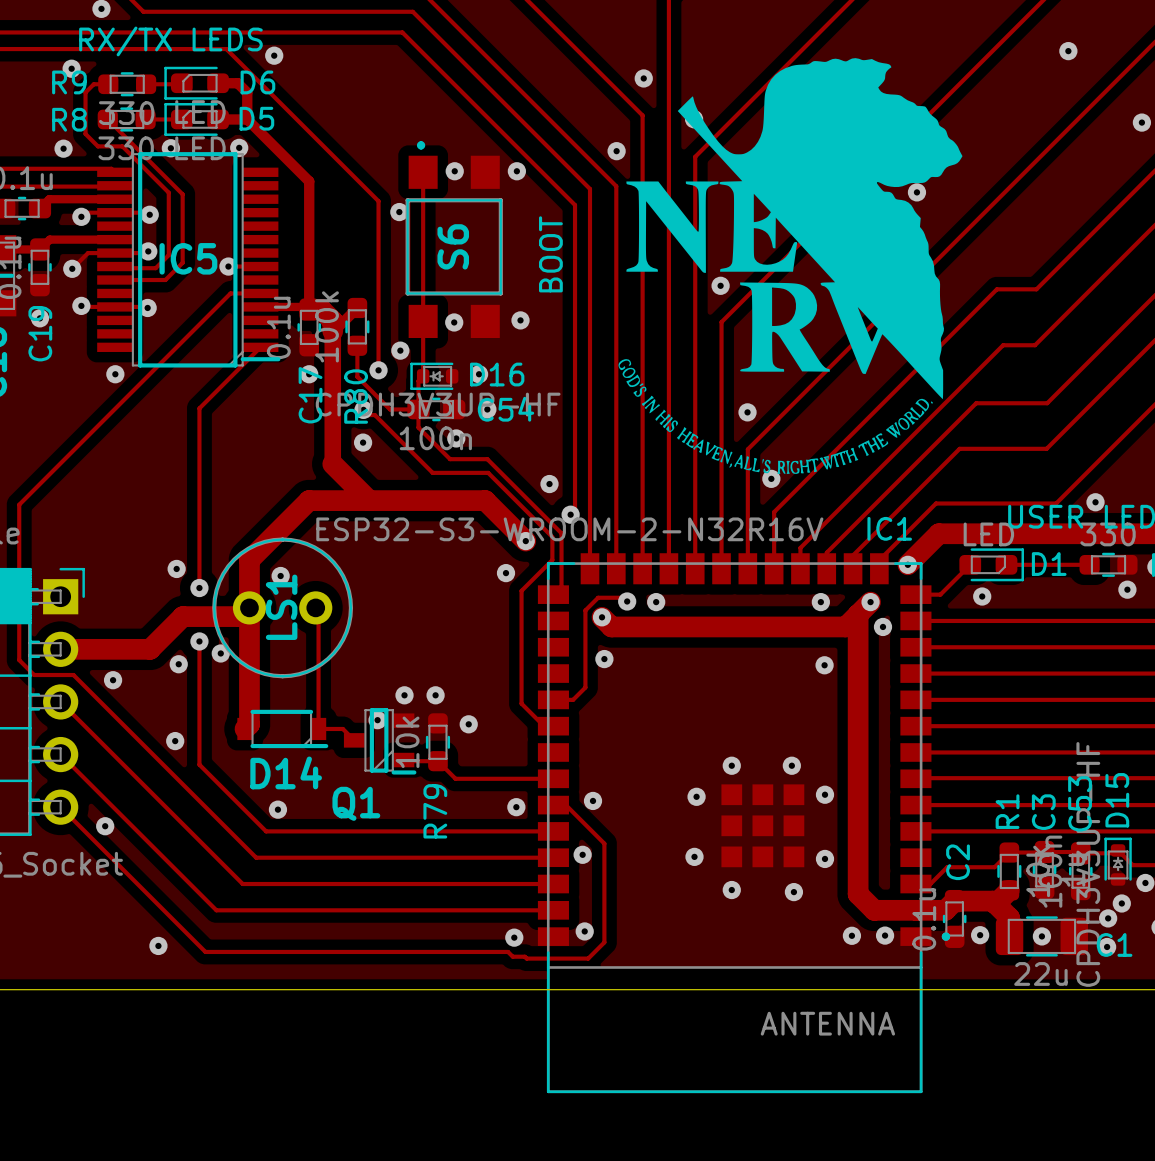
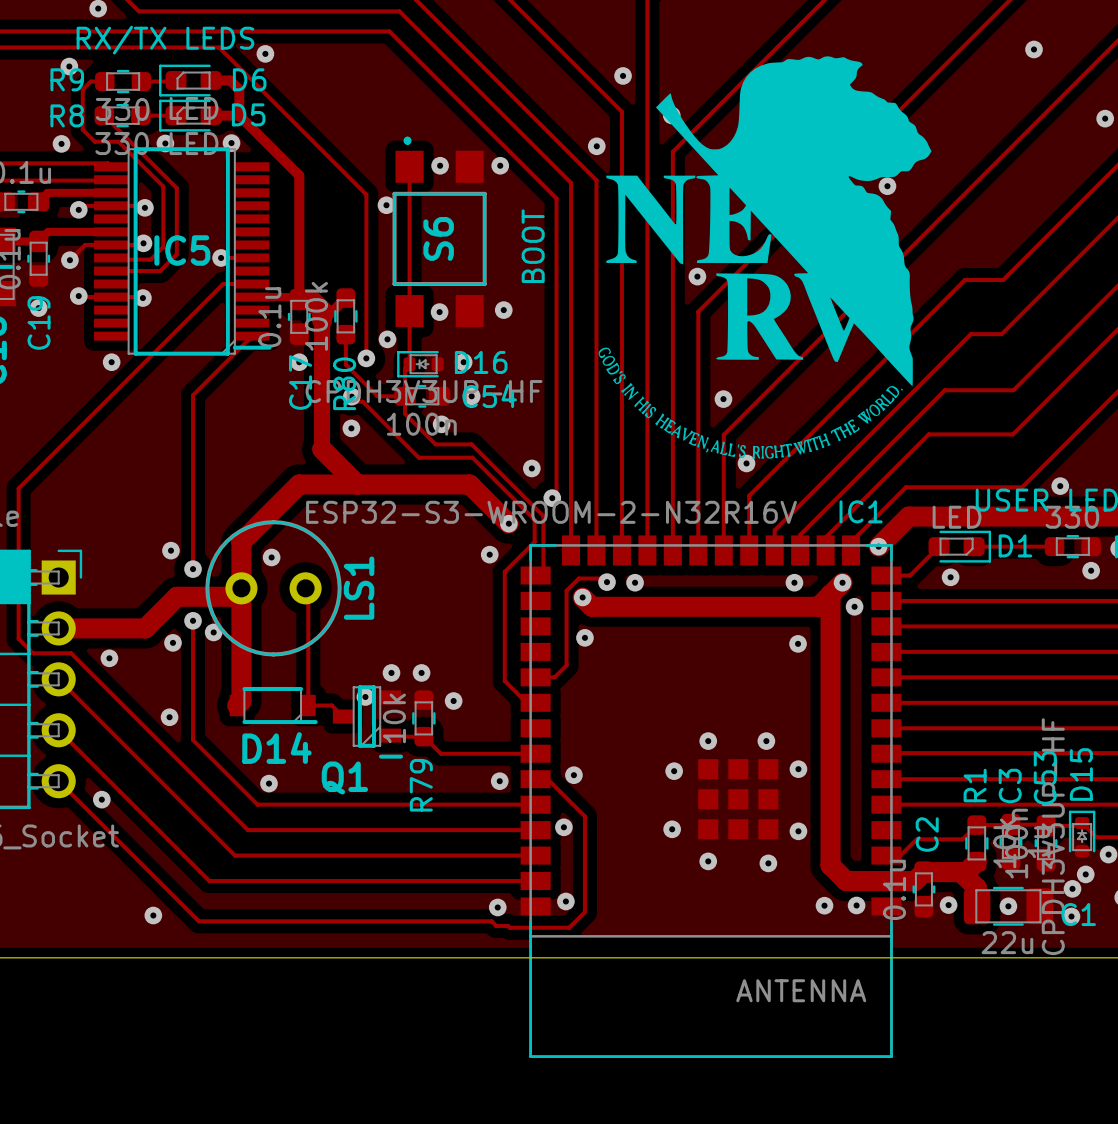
IC1 footprint: [537, 553, 951, 1094] -> [520, 535, 902, 1058]
LS1 name position: LS1 (281, 607) -> LS1 (359, 588)
Q1 footprint: [343, 708, 417, 775] -> [332, 685, 404, 759]

